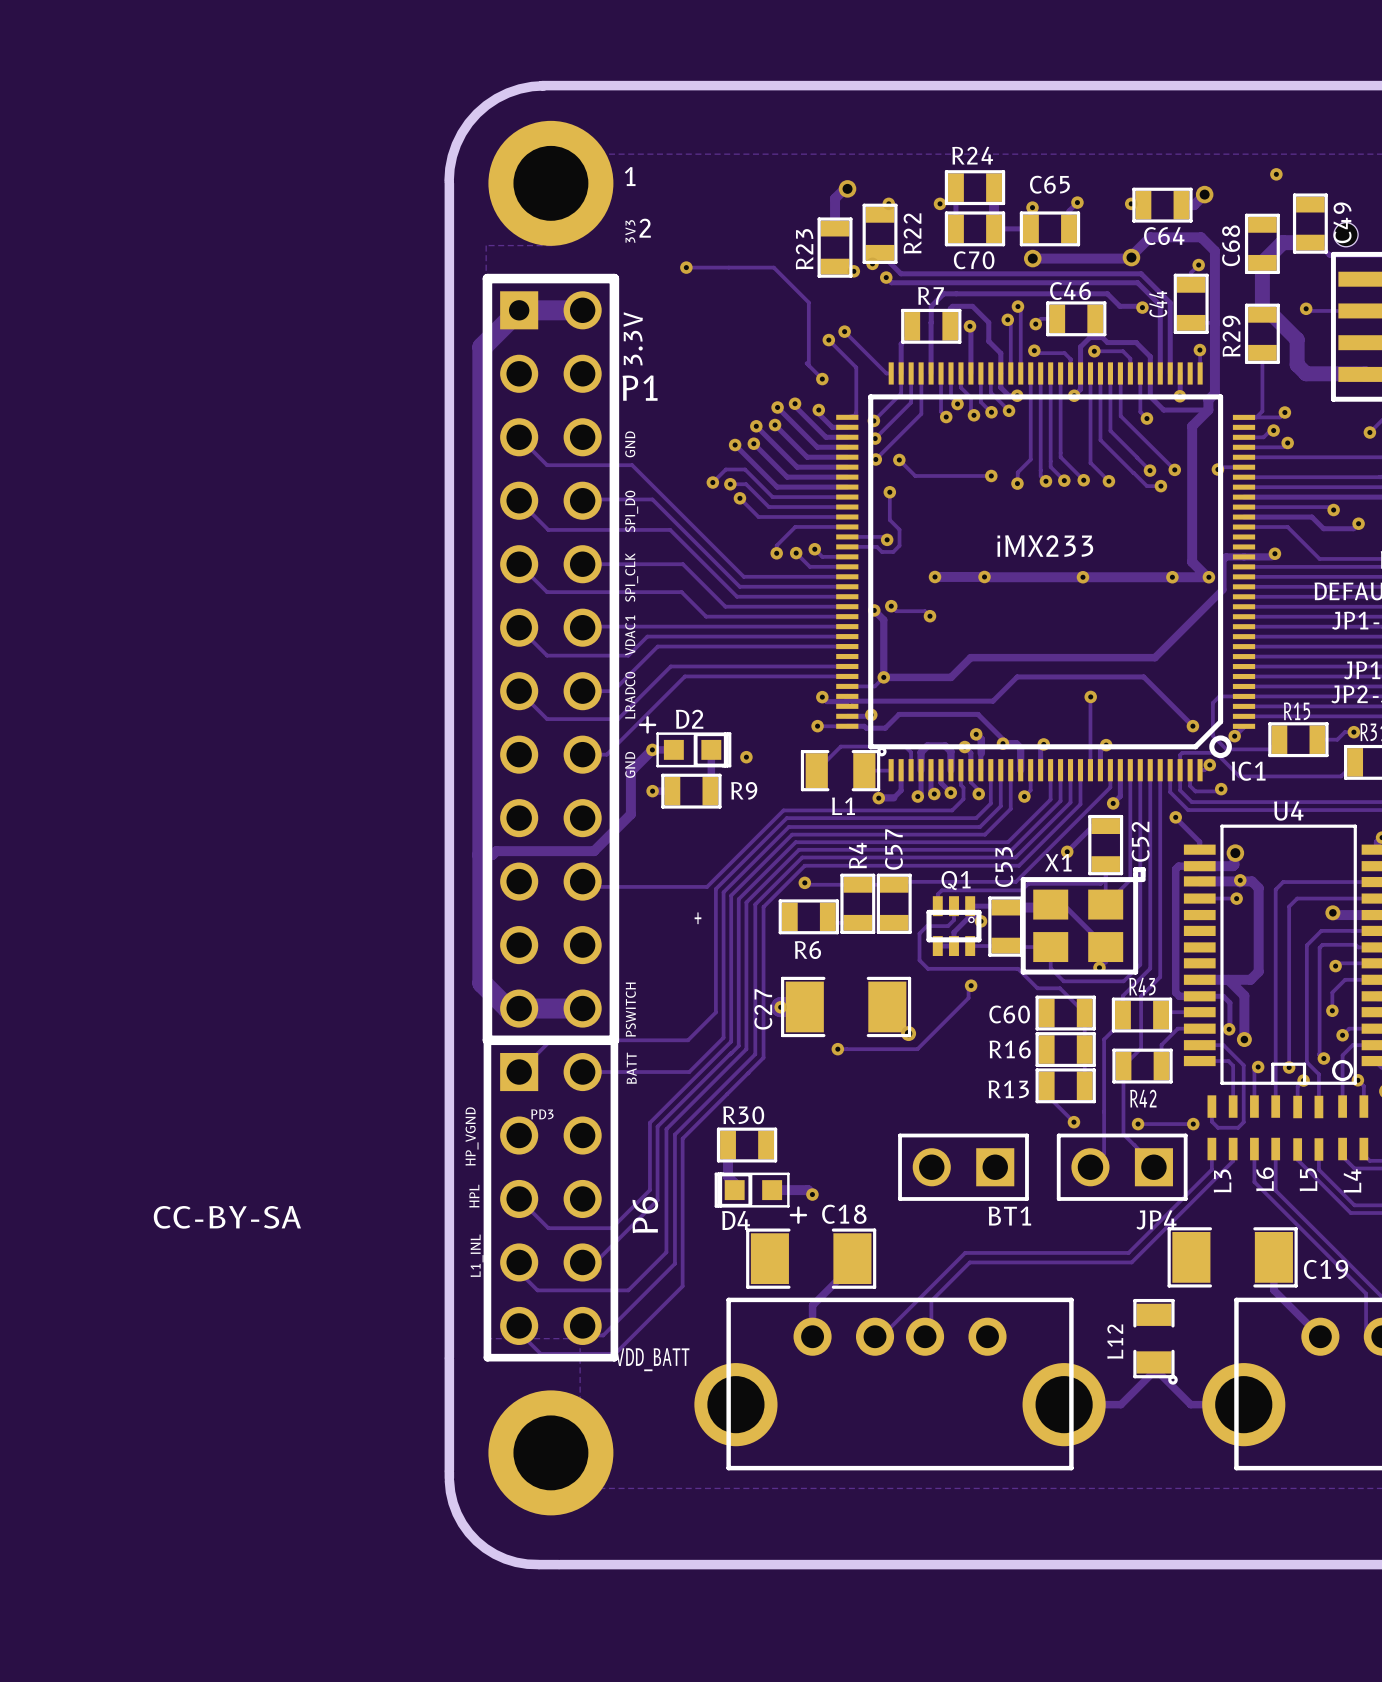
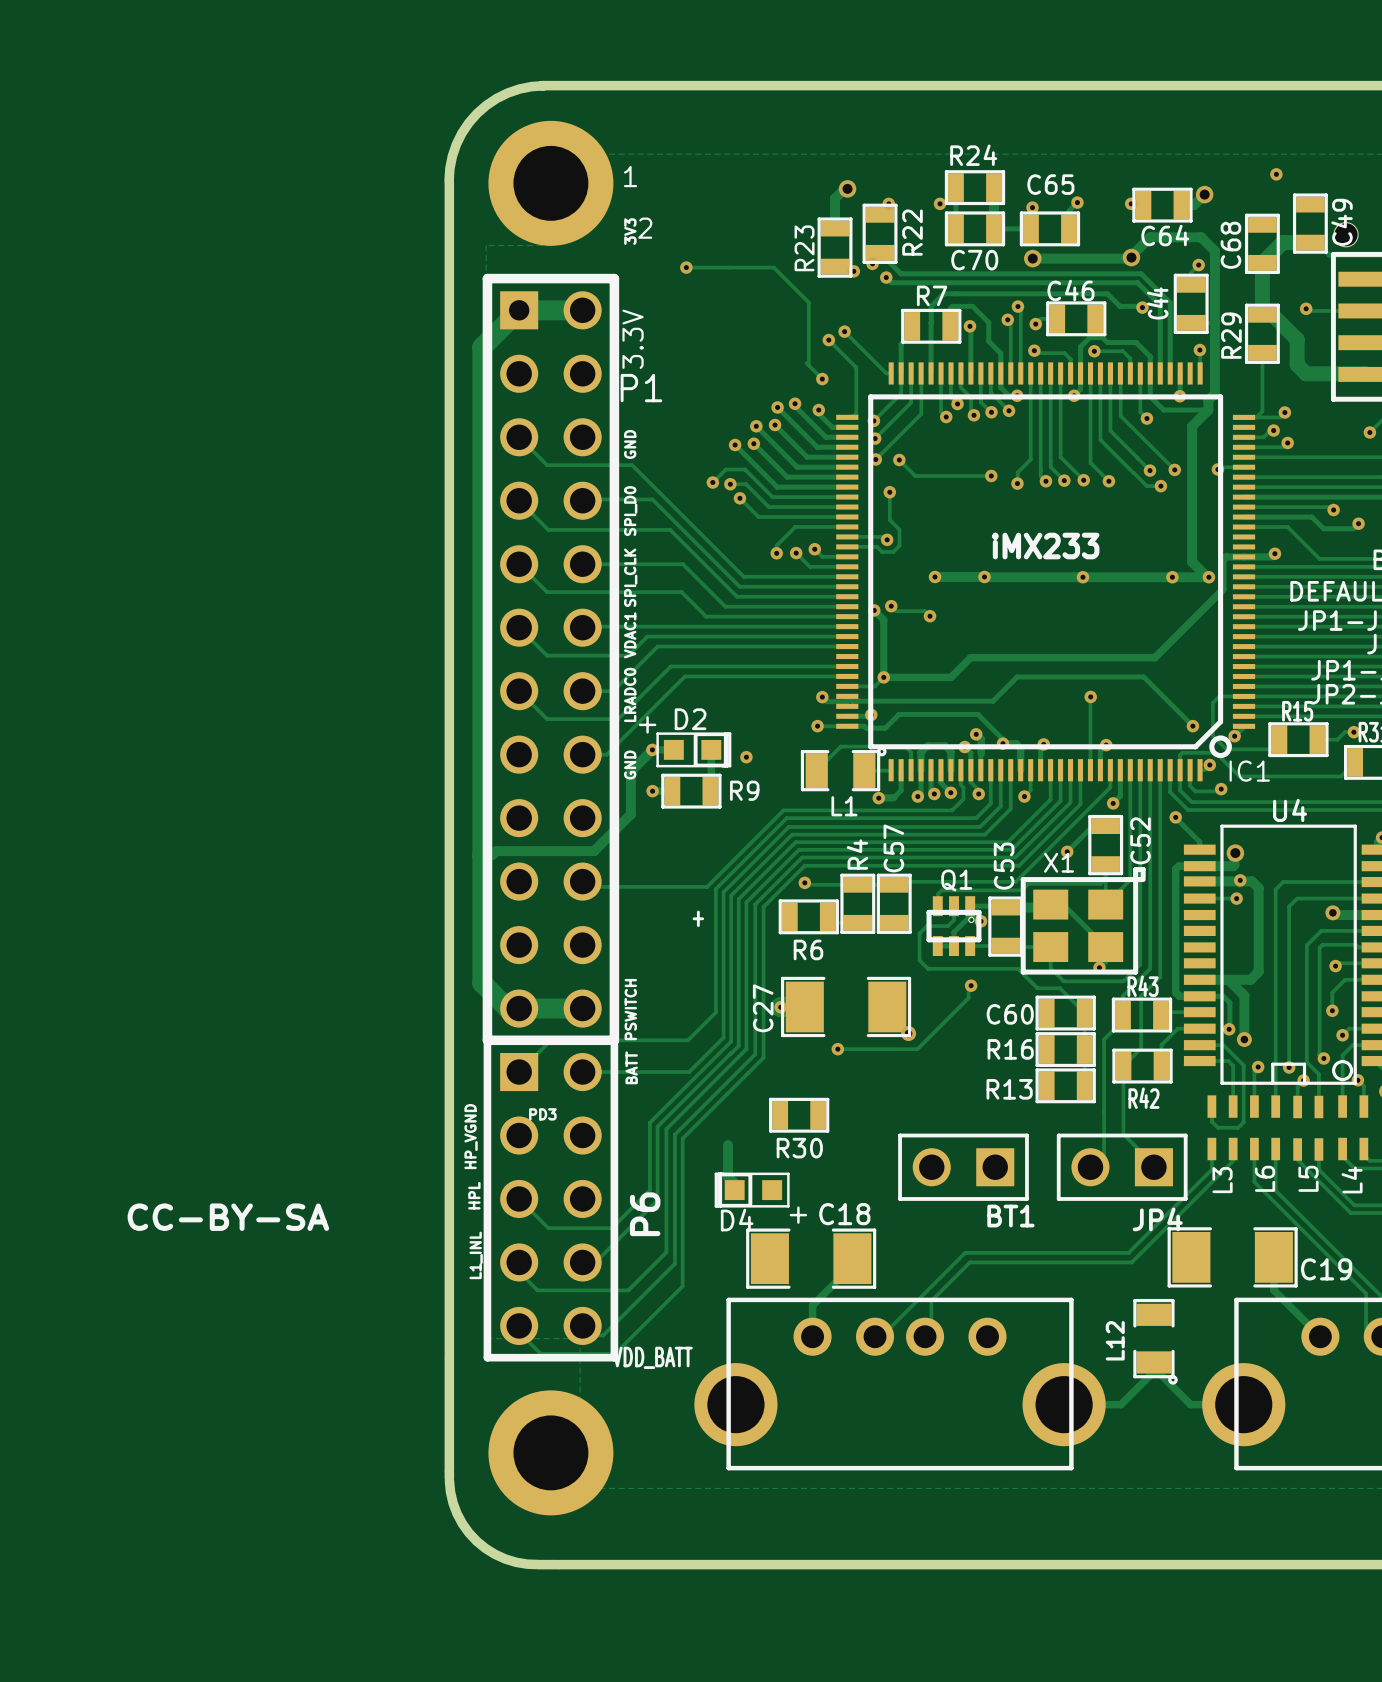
track: (1046, 1085) (1046, 1094) (1073, 1122) -> none
R30 name position: R30 (743, 1115) -> R30 (799, 1148)
via: (1073, 1122) -> none
track: (1138, 1124) (1193, 1124) -> none
via: (1138, 1124) -> none
via: (1193, 1124) -> none
R30 position: (747, 1145) -> (799, 1115)
track: (772, 1190) (807, 1190) (812, 1194) -> none
via: (812, 1194) -> none

